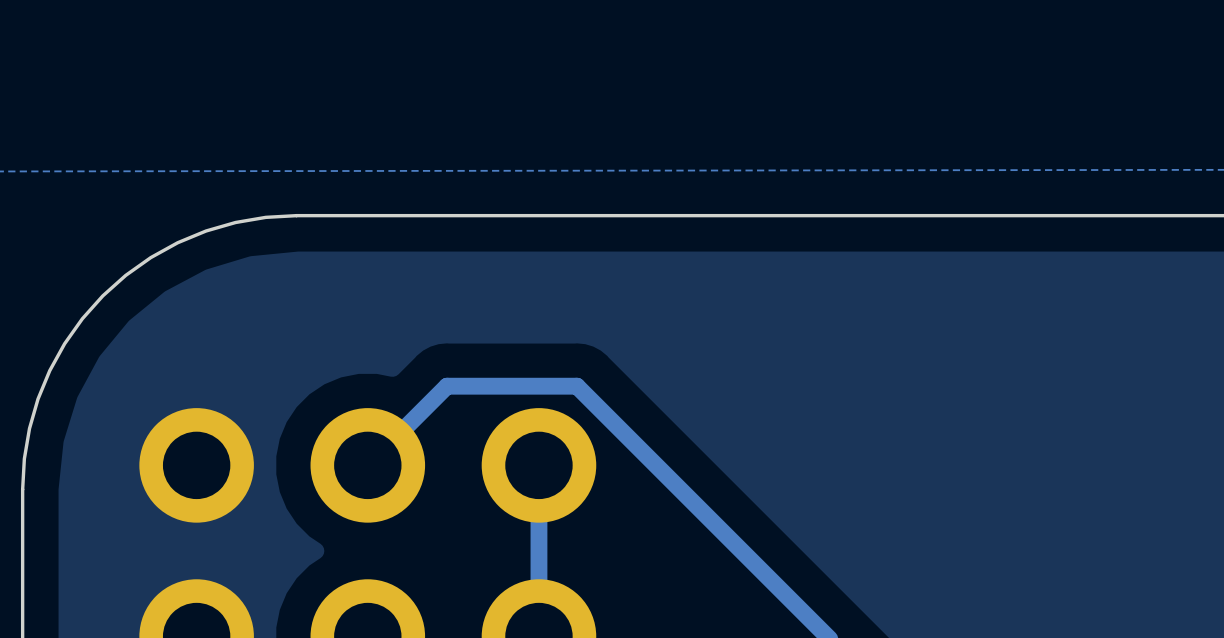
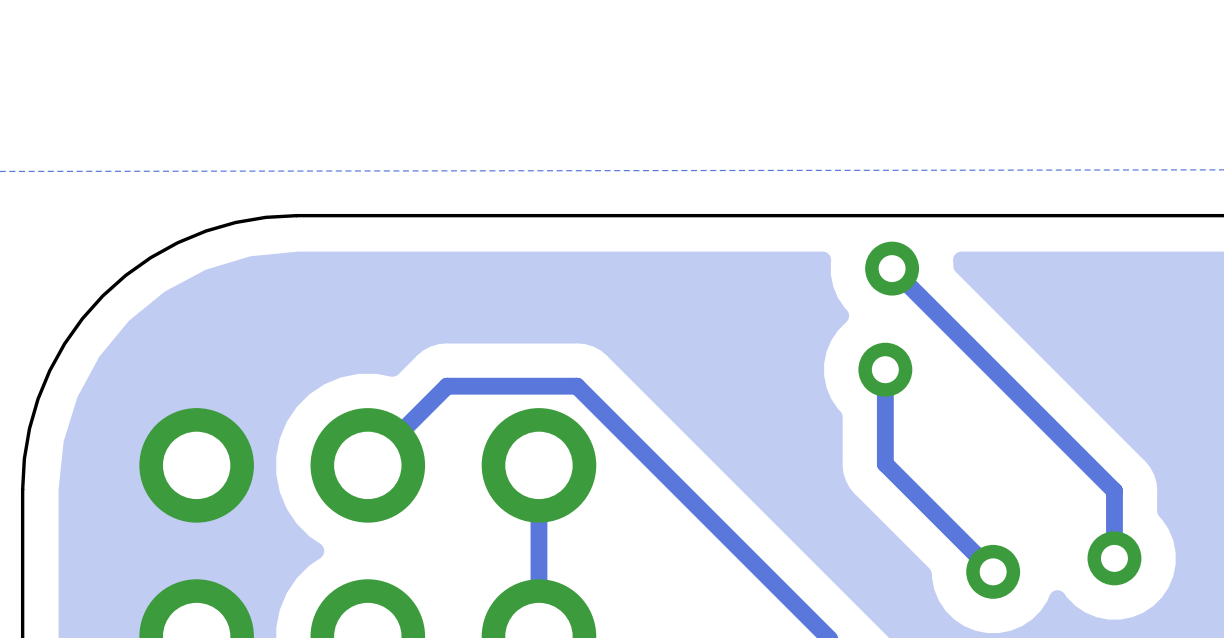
track: none -> (892, 268) (1114, 490) (1114, 558)
via: none -> (892, 268)
track: none -> (885, 369) (885, 464) (993, 571)
via: none -> (885, 369)
via: none -> (1114, 558)
via: none -> (993, 571)

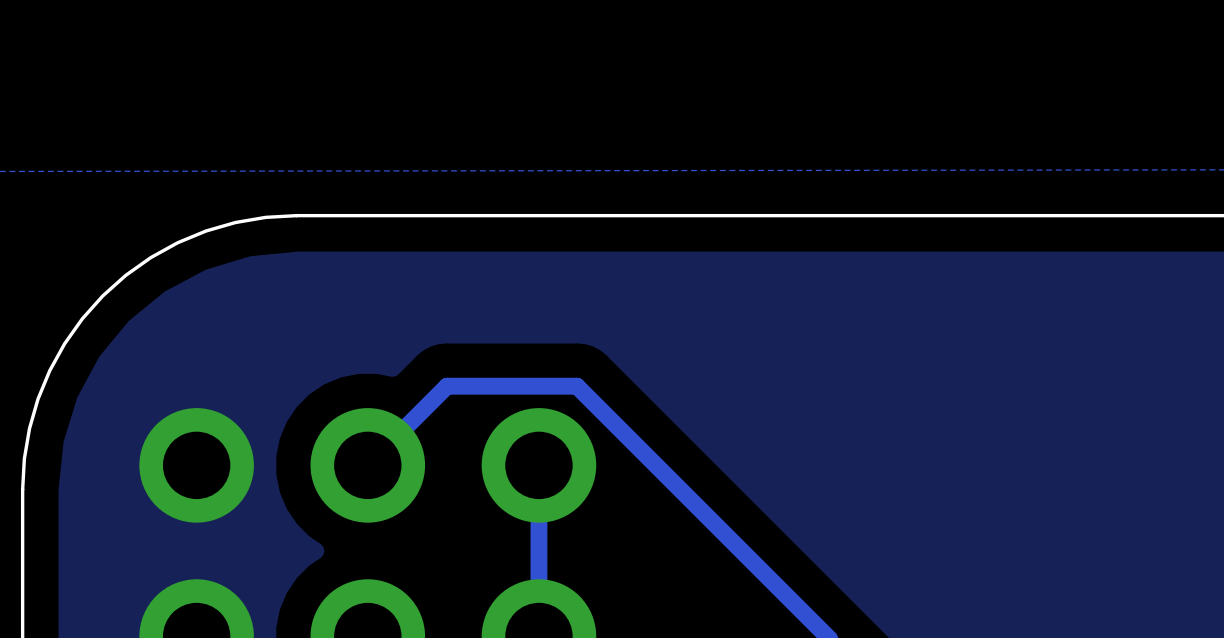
track: (892, 268) (1114, 490) (1114, 558) -> none
via: (892, 268) -> none
track: (885, 369) (885, 464) (993, 571) -> none
via: (885, 369) -> none
via: (1114, 558) -> none
via: (993, 571) -> none

